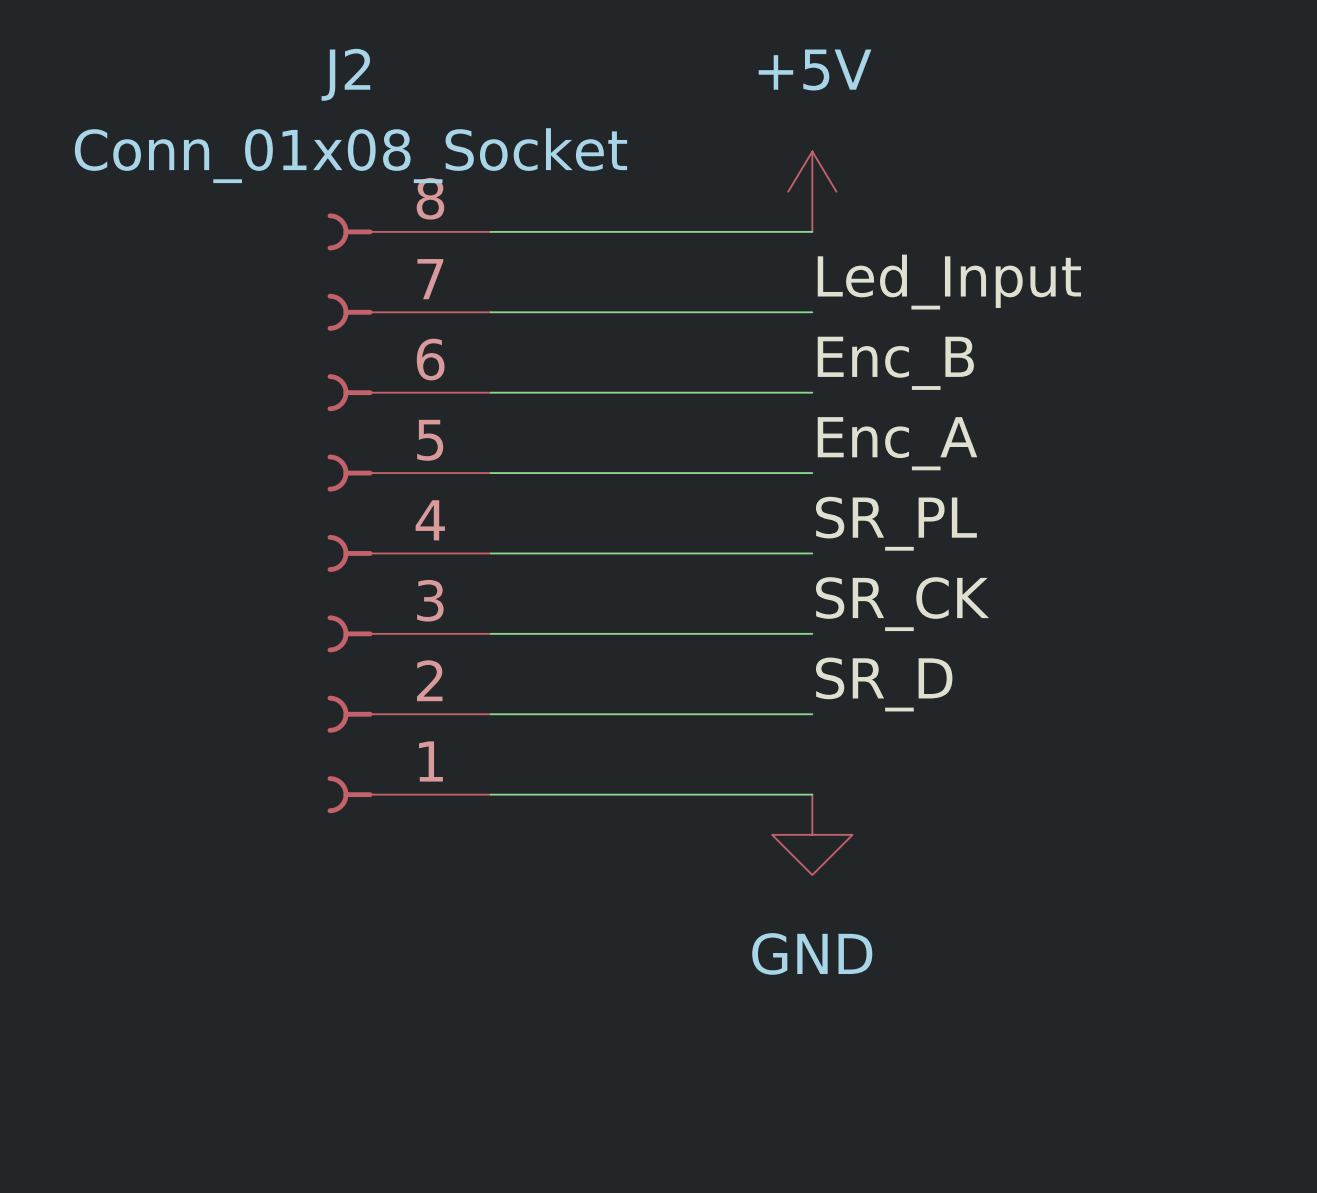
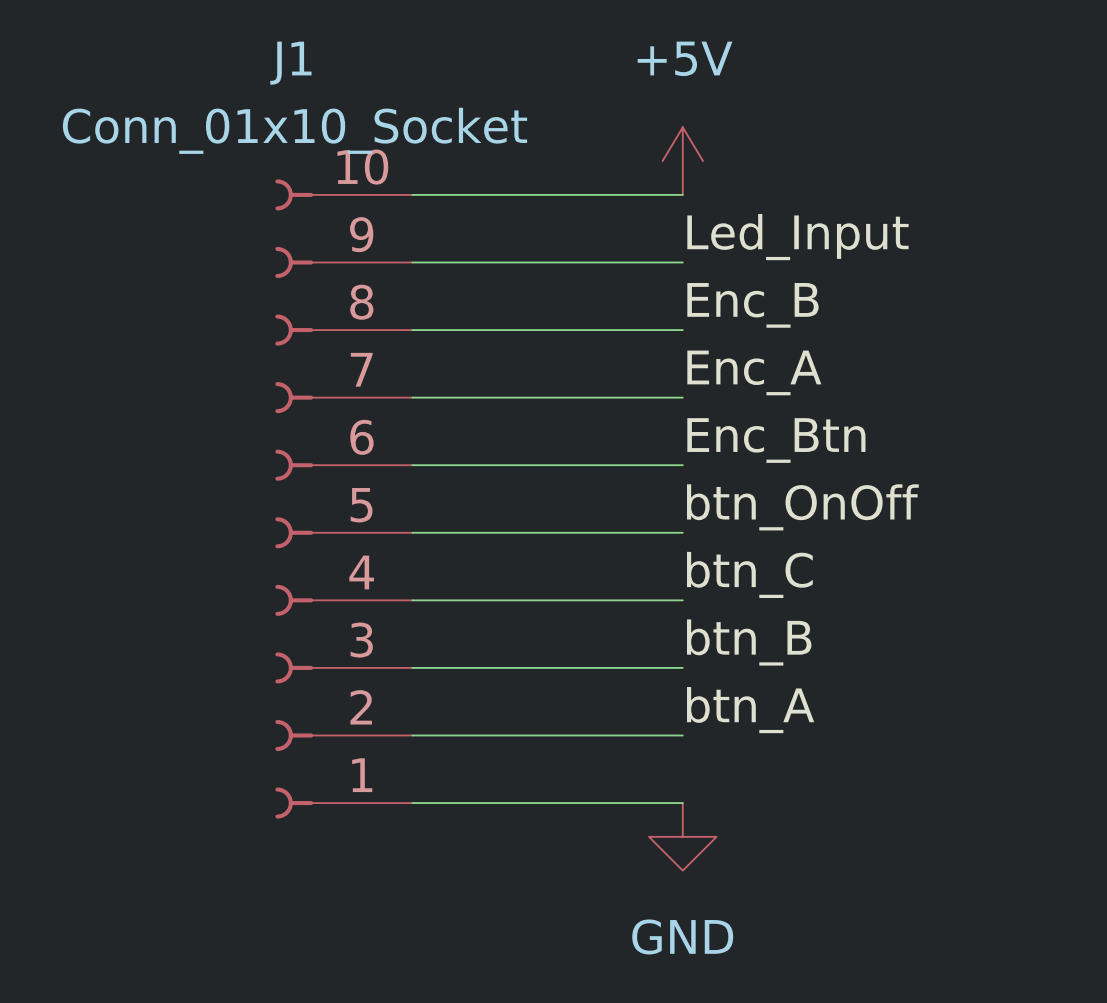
J2: Conn_01x08_Socket (409, 513) -> none
label: SR_PL (896, 523) -> Enc_Btn (776, 440)
J1: none -> Conn_01x10_Socket (343, 498)
label: SR_CK (902, 604) -> btn_OnOff (802, 507)
label: SR_D (884, 684) -> btn_C (749, 574)
label: none -> btn_B (749, 642)
power symbol position: GND (812, 834) -> GND (682, 836)
label: none -> btn_A (750, 710)
wire: none -> (412, 735) (682, 735)
wire: none -> (412, 803) (682, 803)

